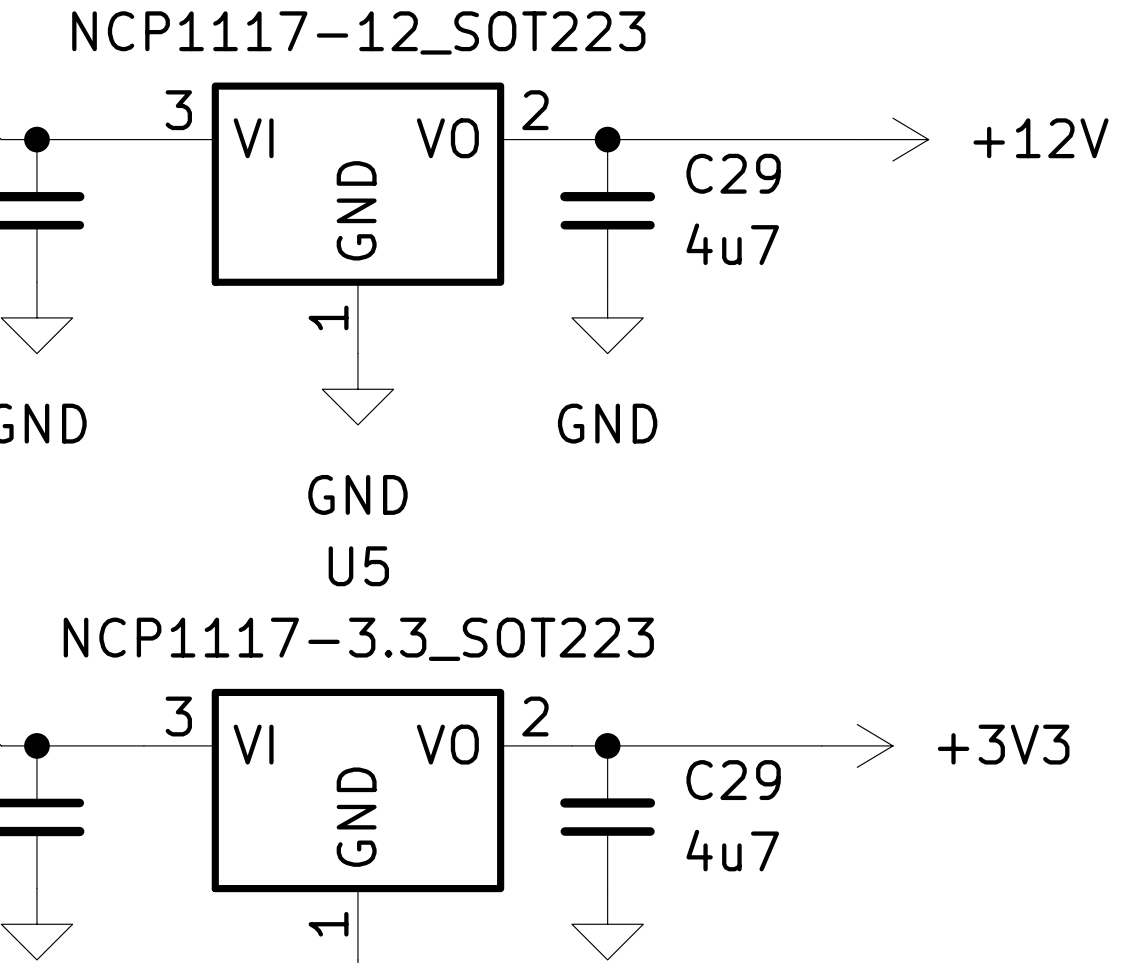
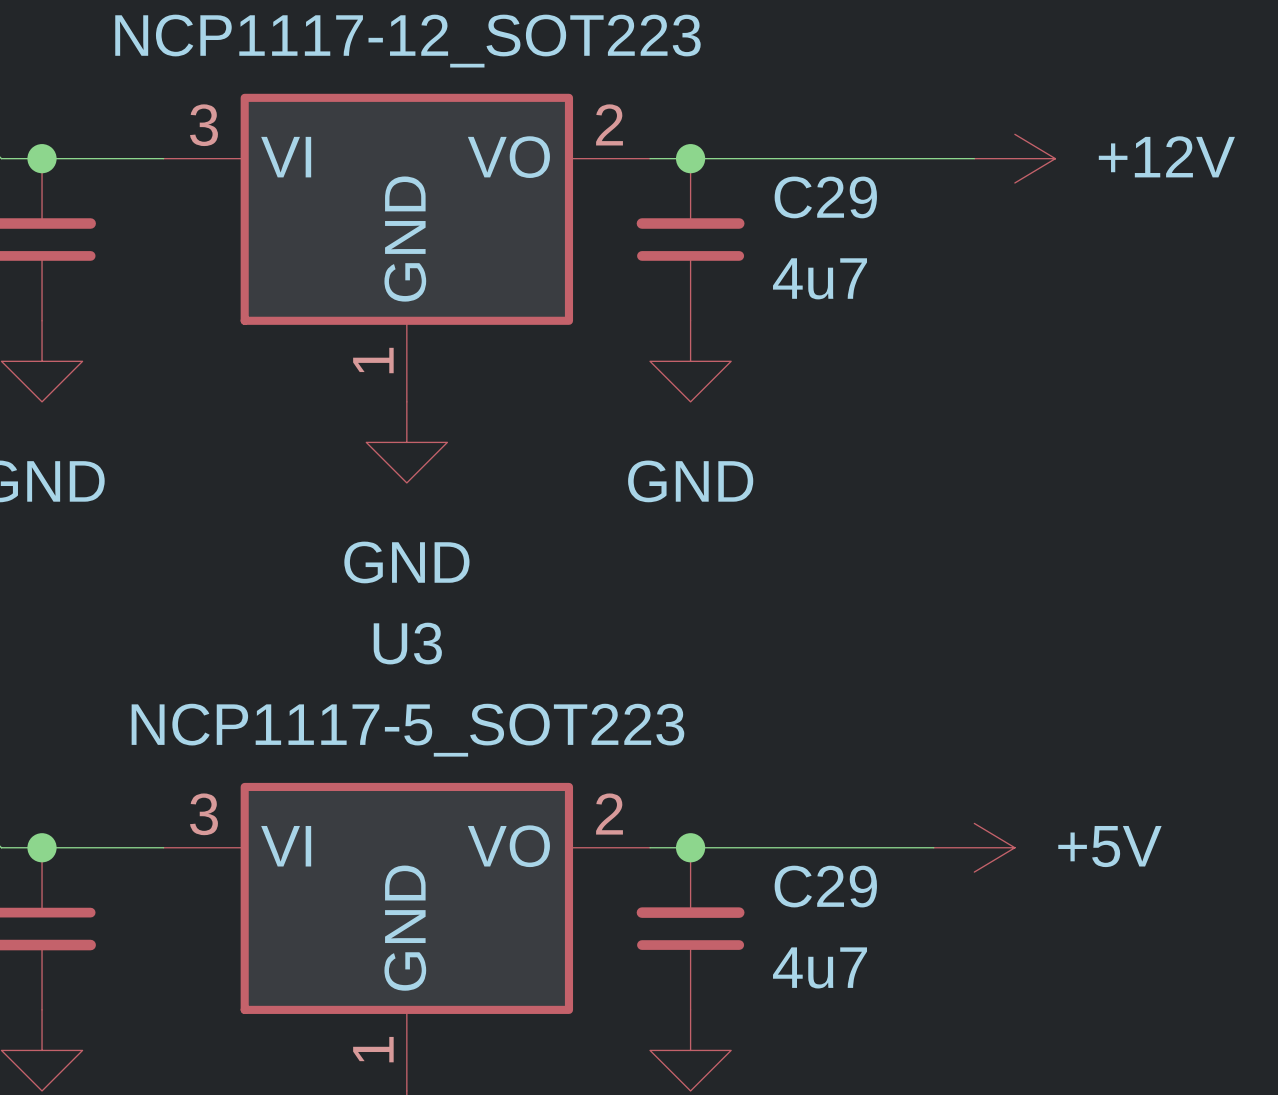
U5 name: U5 (358, 566) -> U3 (407, 643)
U5 value: NCP1117-3.3_SOT223 (358, 639) -> NCP1117-5_SOT223 (407, 730)
power symbol: +3V3 (857, 745) -> +5V (974, 847)

